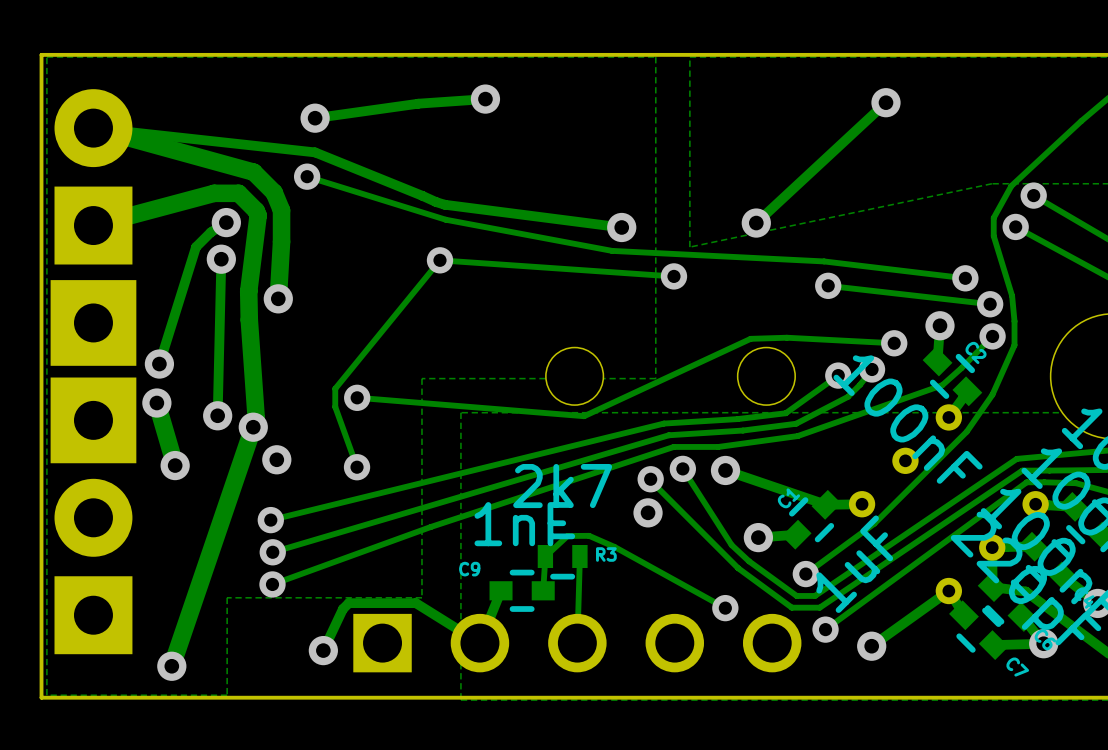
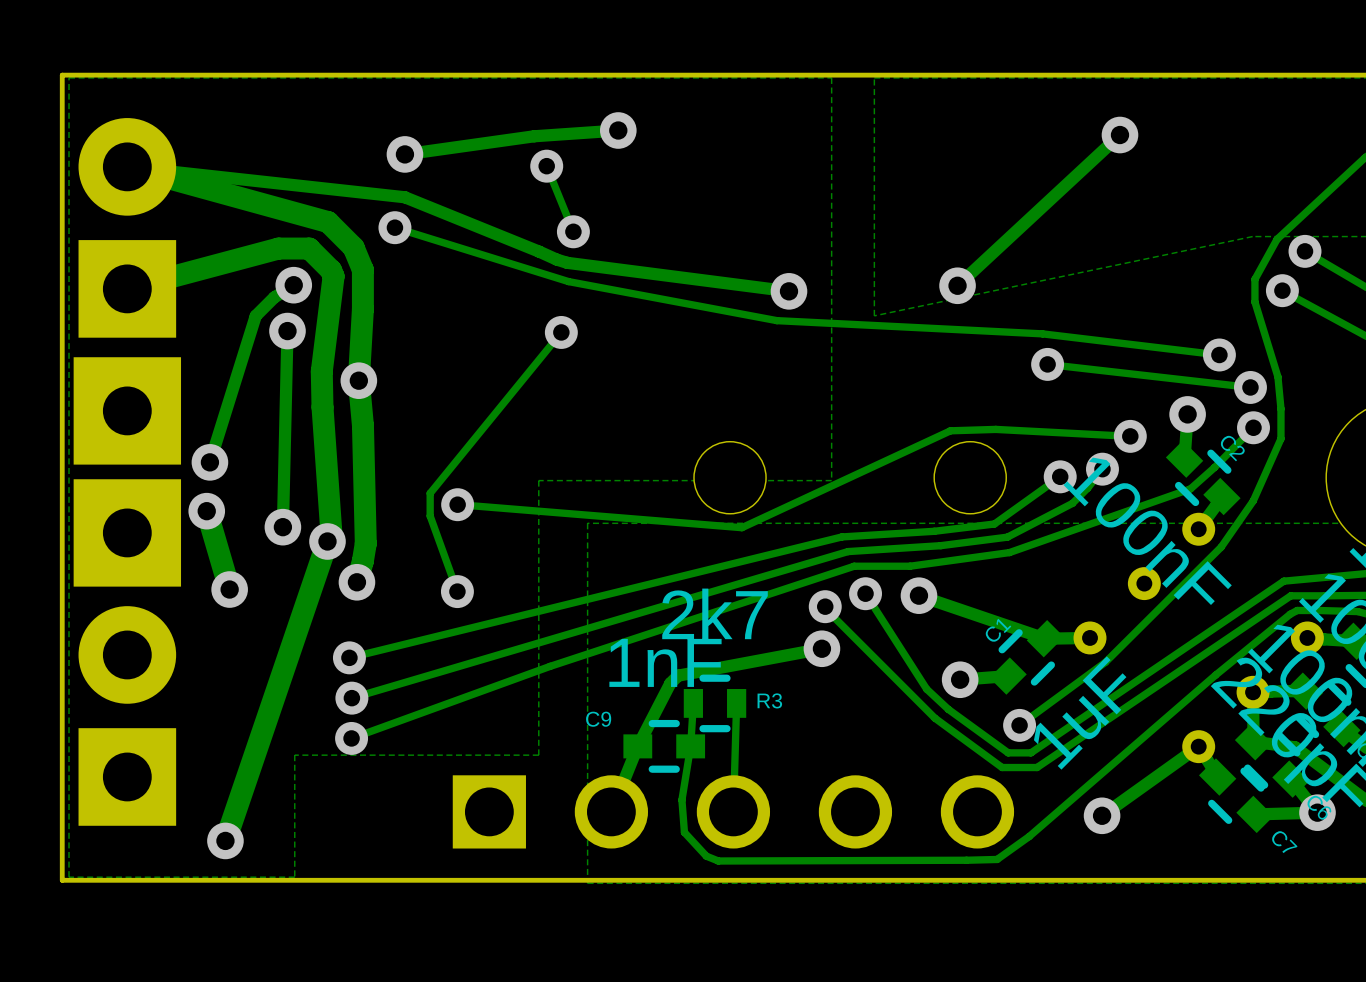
track: none -> (546, 166) (573, 231)
via: none -> (546, 166)
via: none -> (573, 231)
track: (673, 276) (439, 260) (335, 388) -> (561, 332) (430, 493)
via: (673, 276) -> none
track: none -> (358, 380) (362, 425) (365, 543) (356, 582)
track: (1026, 482) (825, 629) -> (1297, 610) (1215, 675) (1029, 836) (997, 859) (718, 861) (706, 856) (684, 832) (681, 800) (690, 746)
track: none -> (821, 648) (678, 675) (670, 683) (637, 746)
track: (545, 556) (567, 536) (589, 535) (614, 546) (725, 608) -> none
via: (725, 608) -> none
via: (825, 629) -> none
track: (479, 643) (415, 603) (348, 603) (342, 609) (323, 650) -> none
via: (323, 650) -> none

